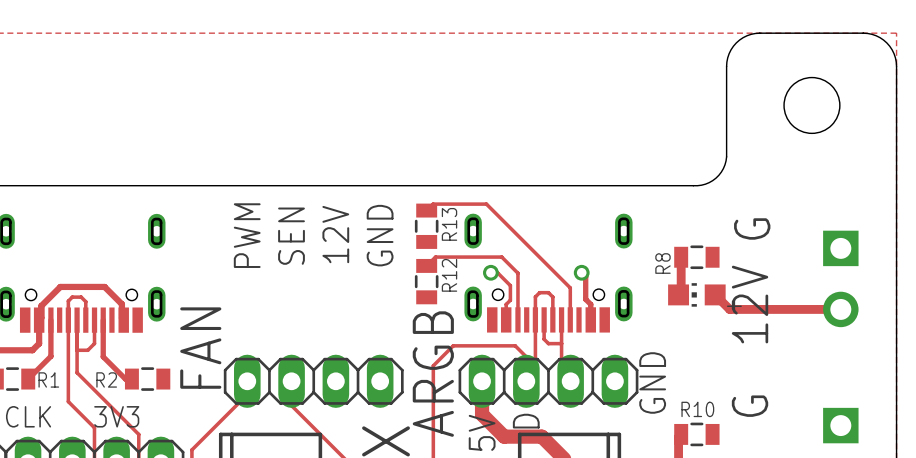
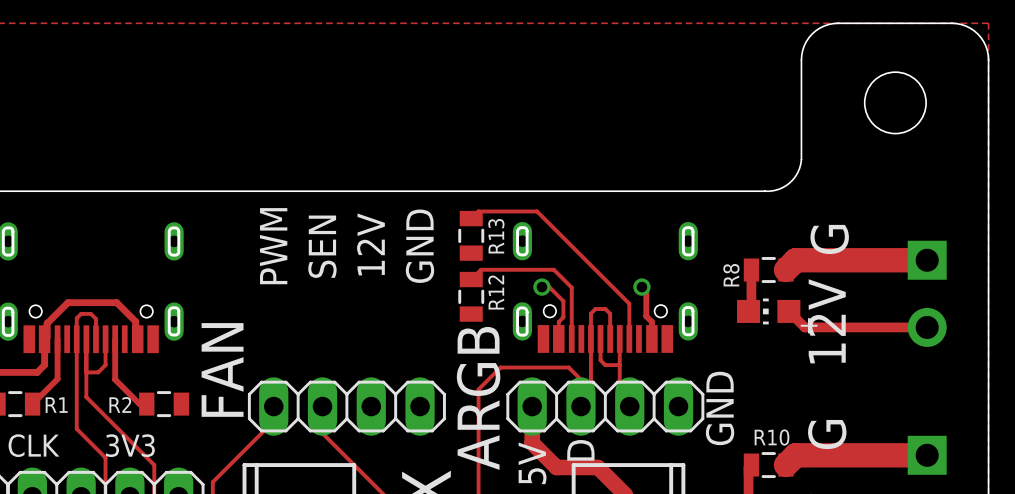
track: none -> (927, 260) (795, 260) (785, 270)
track: none -> (927, 455) (795, 455) (785, 465)

